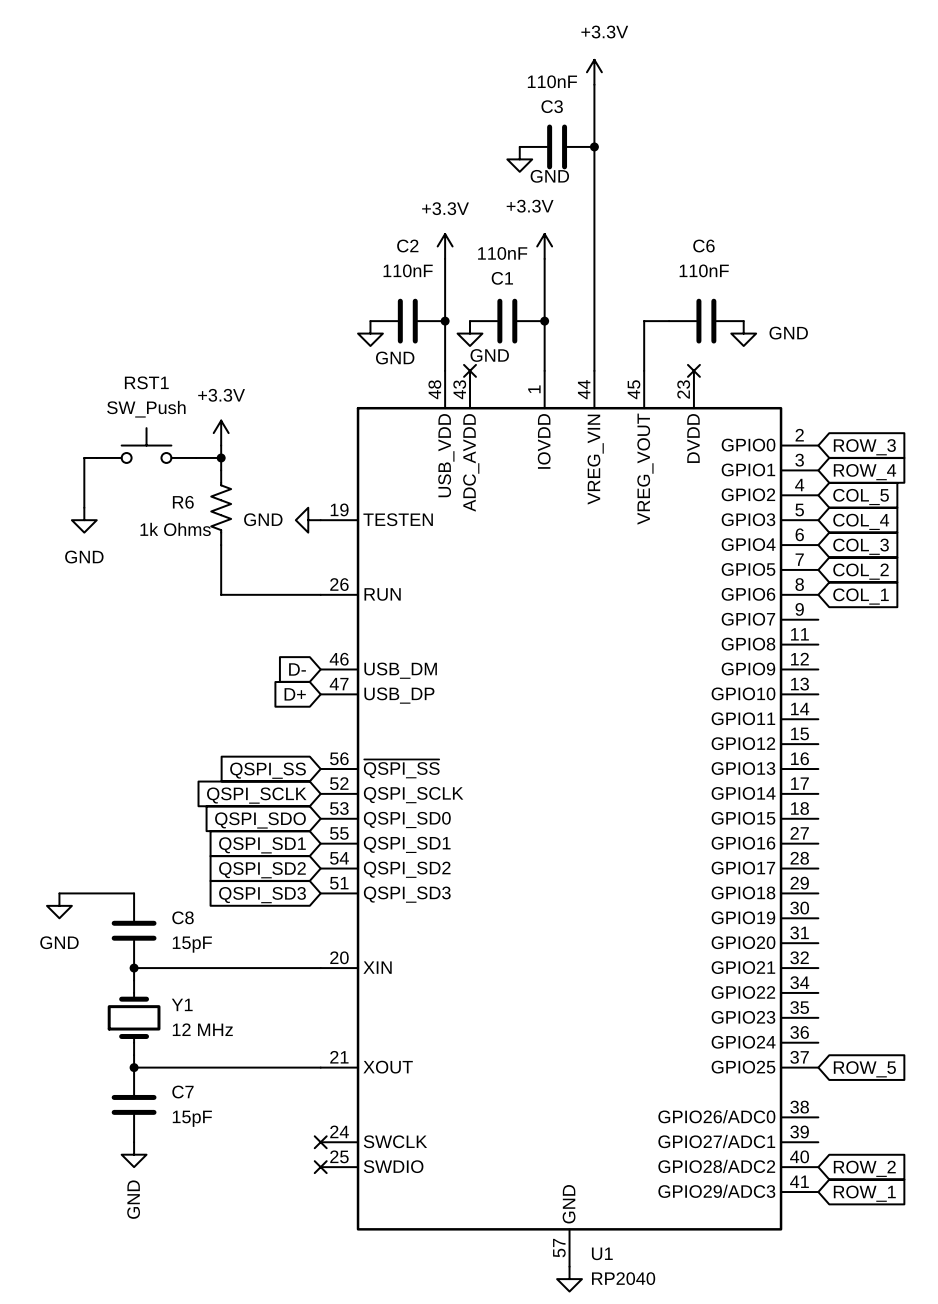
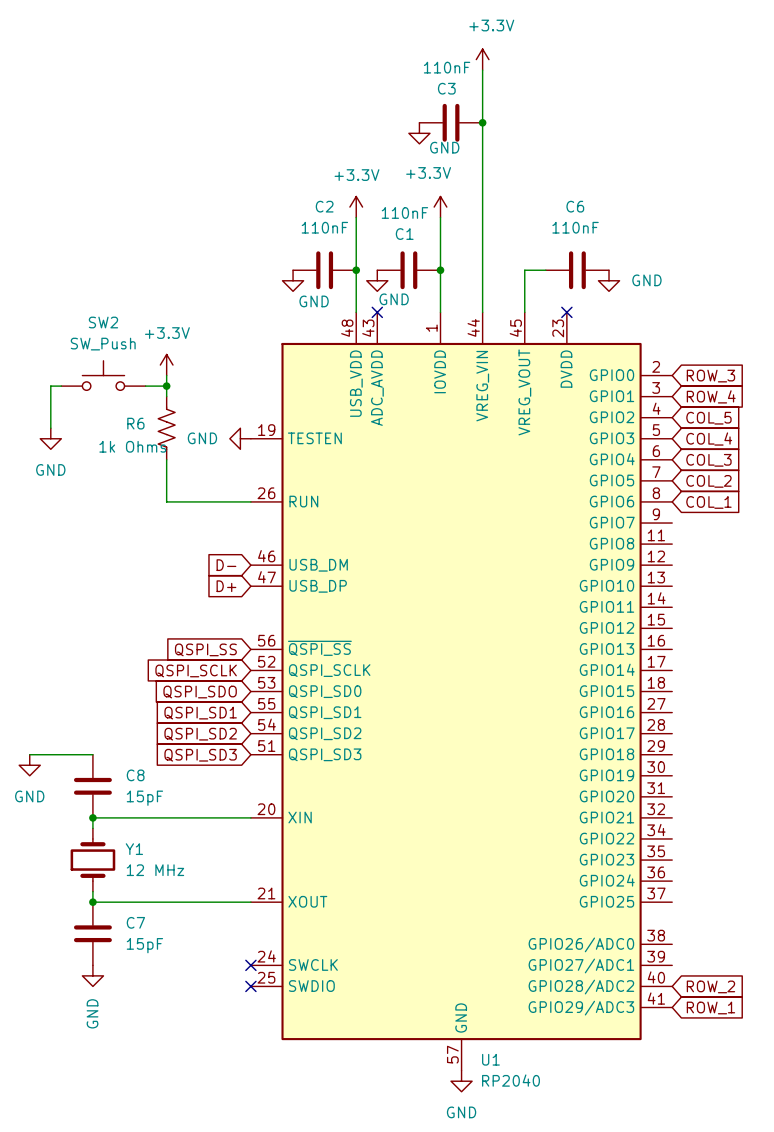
RST1 name: RST1 (146, 382) -> SW2 (103, 322)
global label: ROW_5 (864, 1069) -> none

